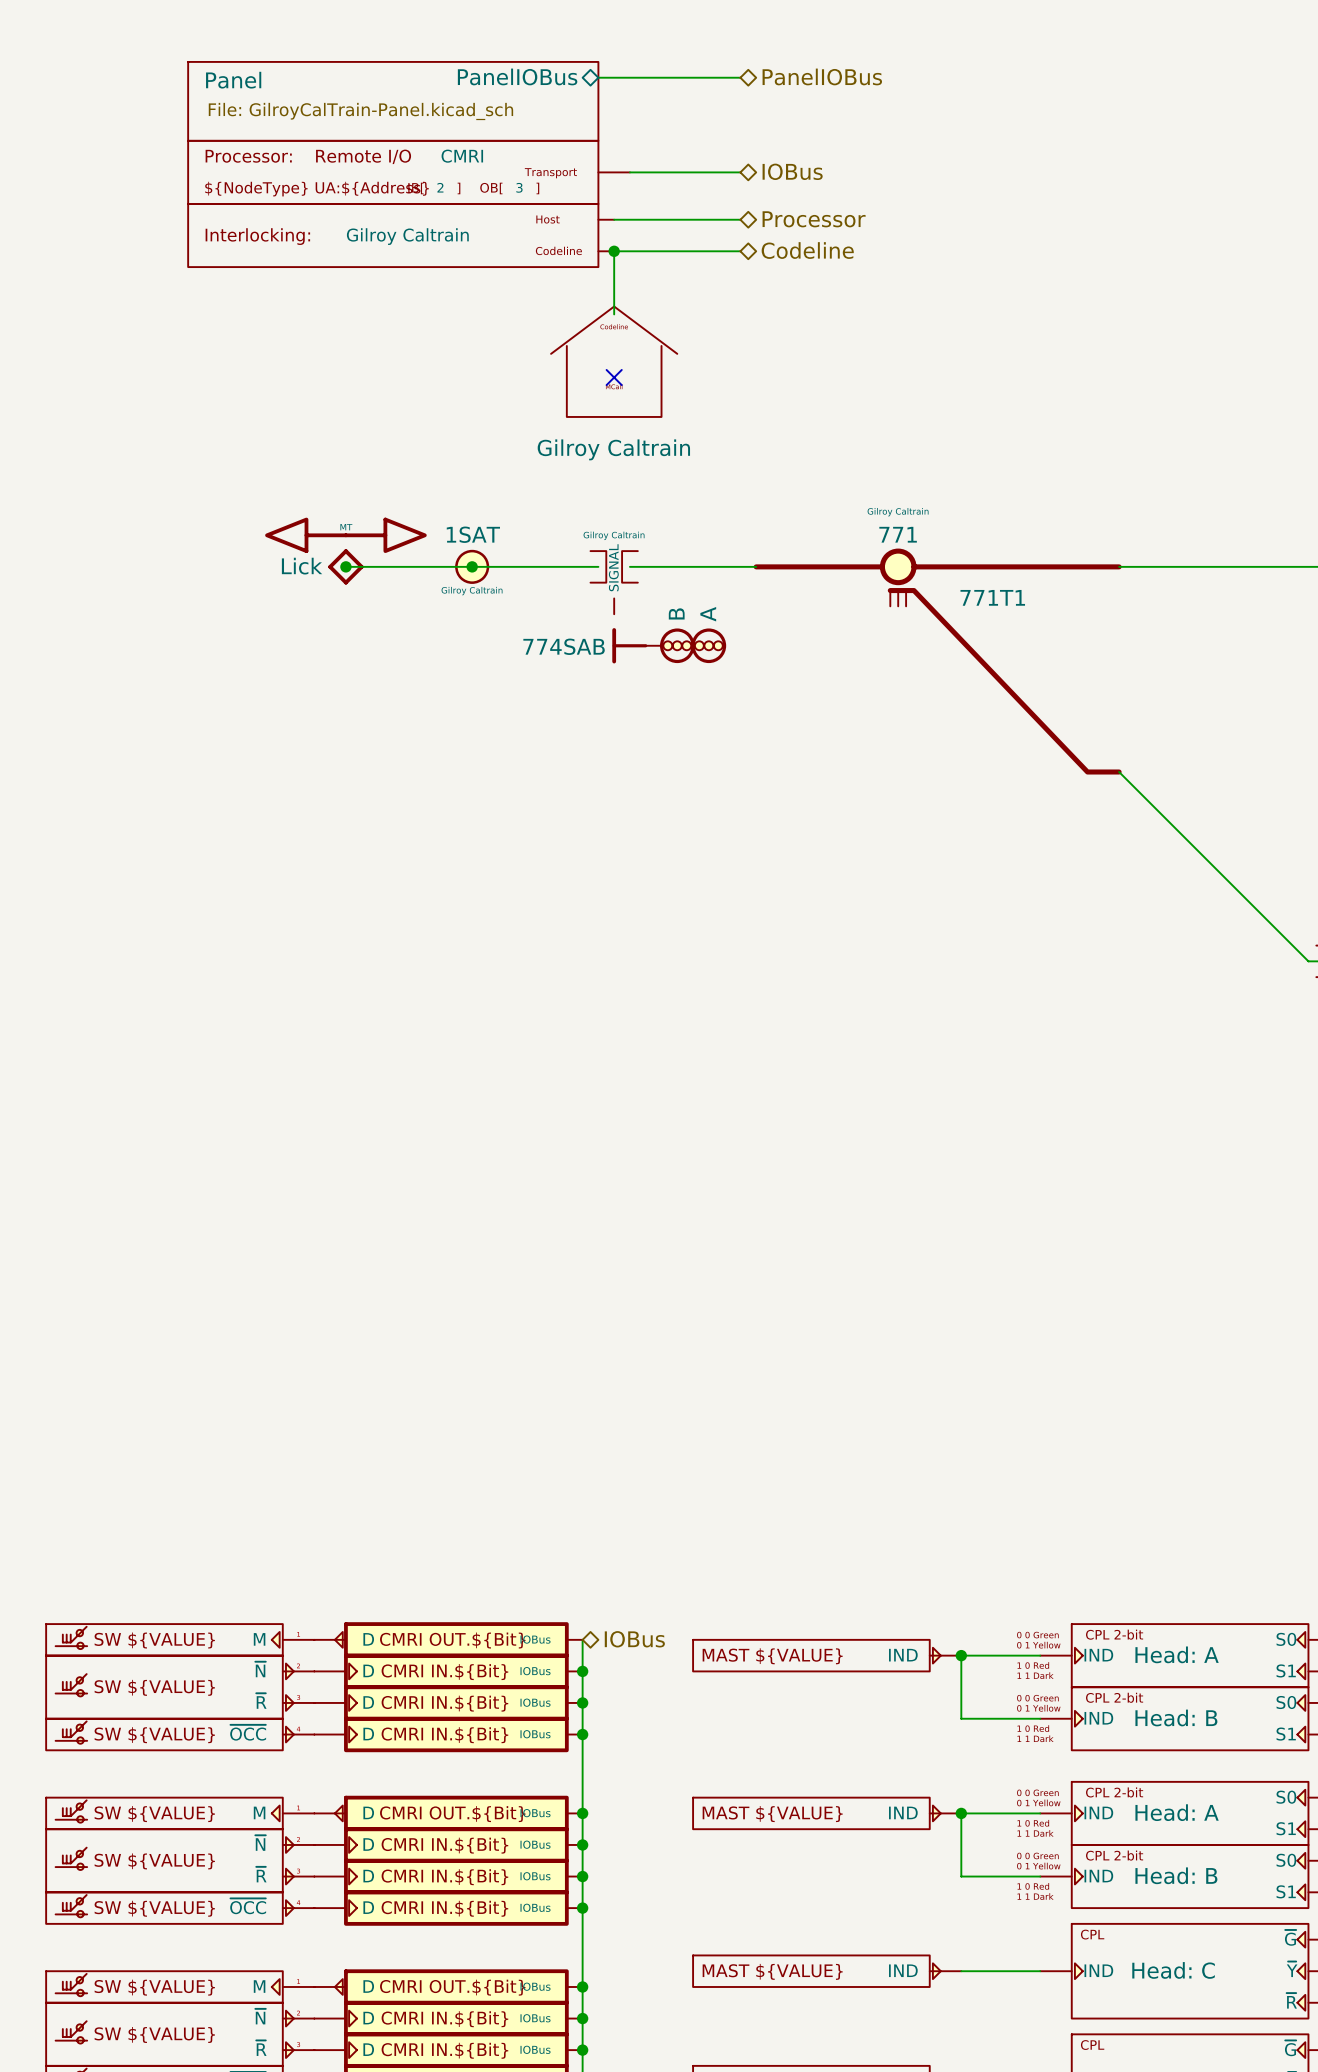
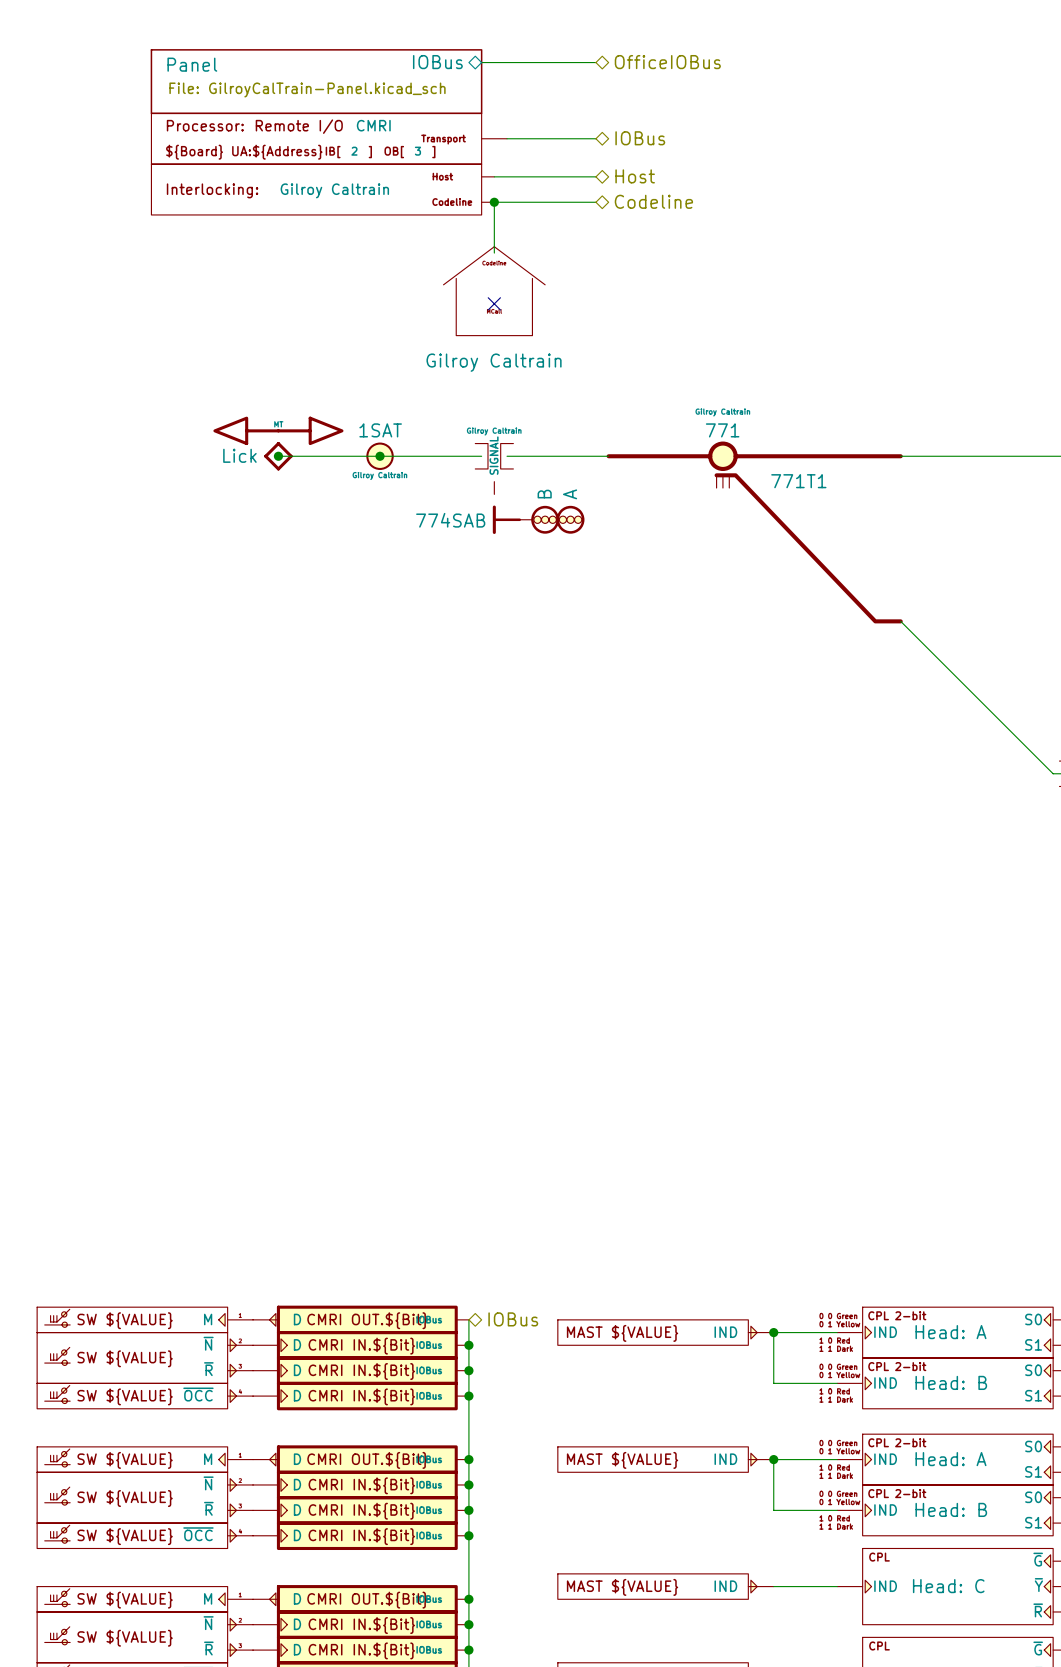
sheet pin: PanelIOBus (517, 76) -> IOBus (437, 62)
hierarchical label: PanelIOBus (822, 76) -> OfficeIOBus (667, 62)
part text: ${NodeType} UA:${Address} (317, 189) -> ${Board} UA:${Address} (244, 152)
hierarchical label: Processor (814, 219) -> Host (635, 176)

